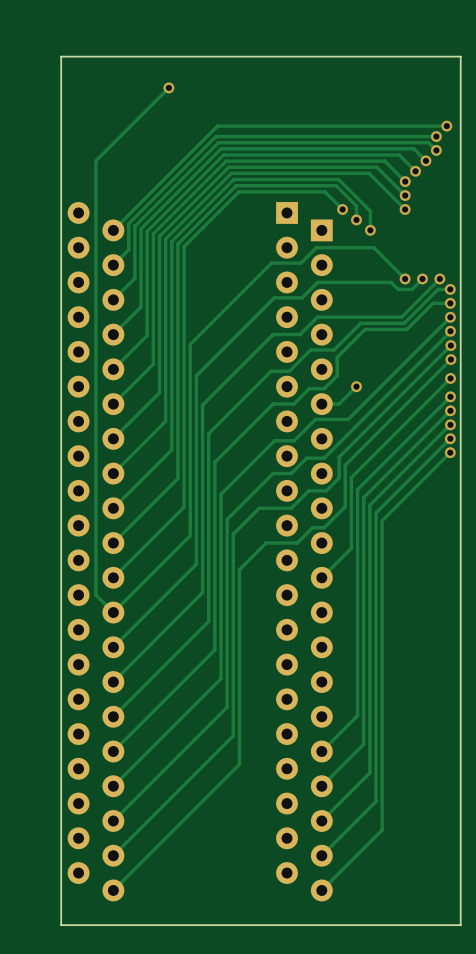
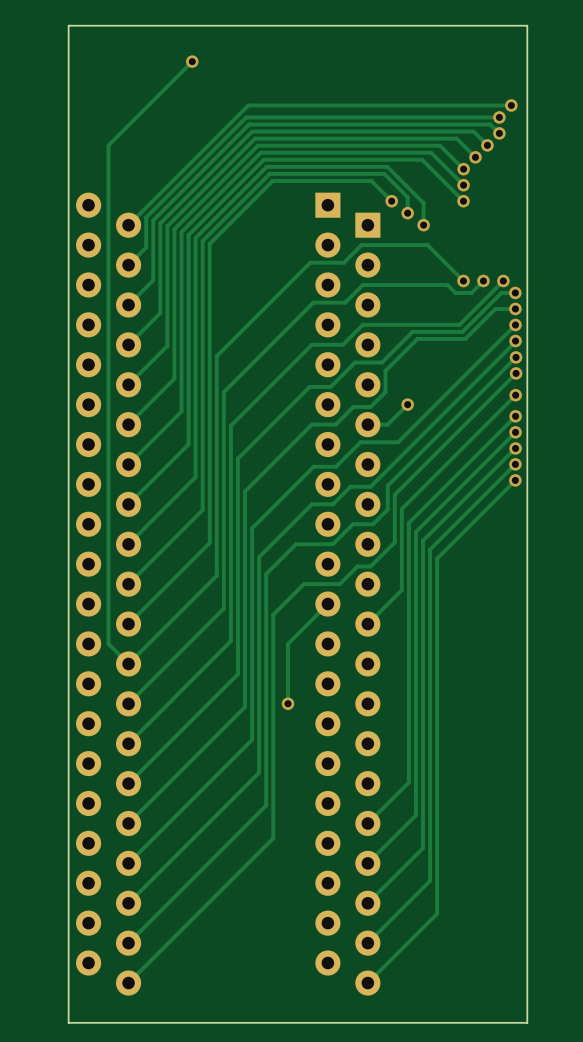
track: none -> (327, 604) (288, 643) (288, 703)
via: none -> (288, 703)

